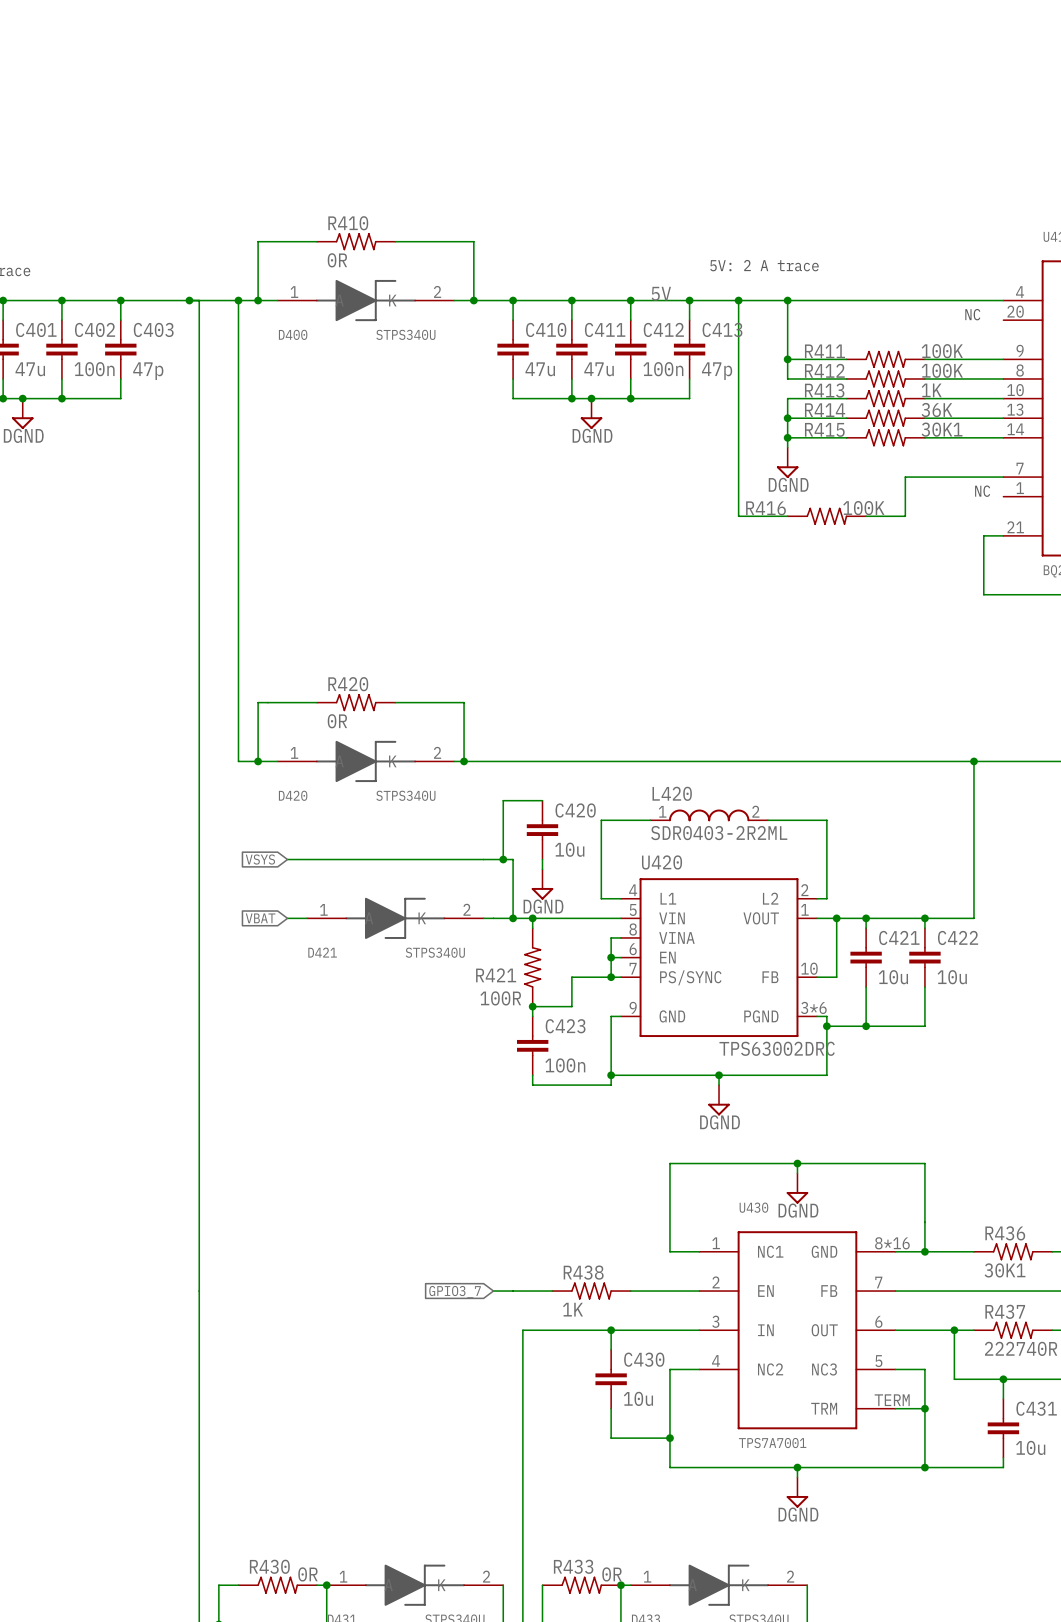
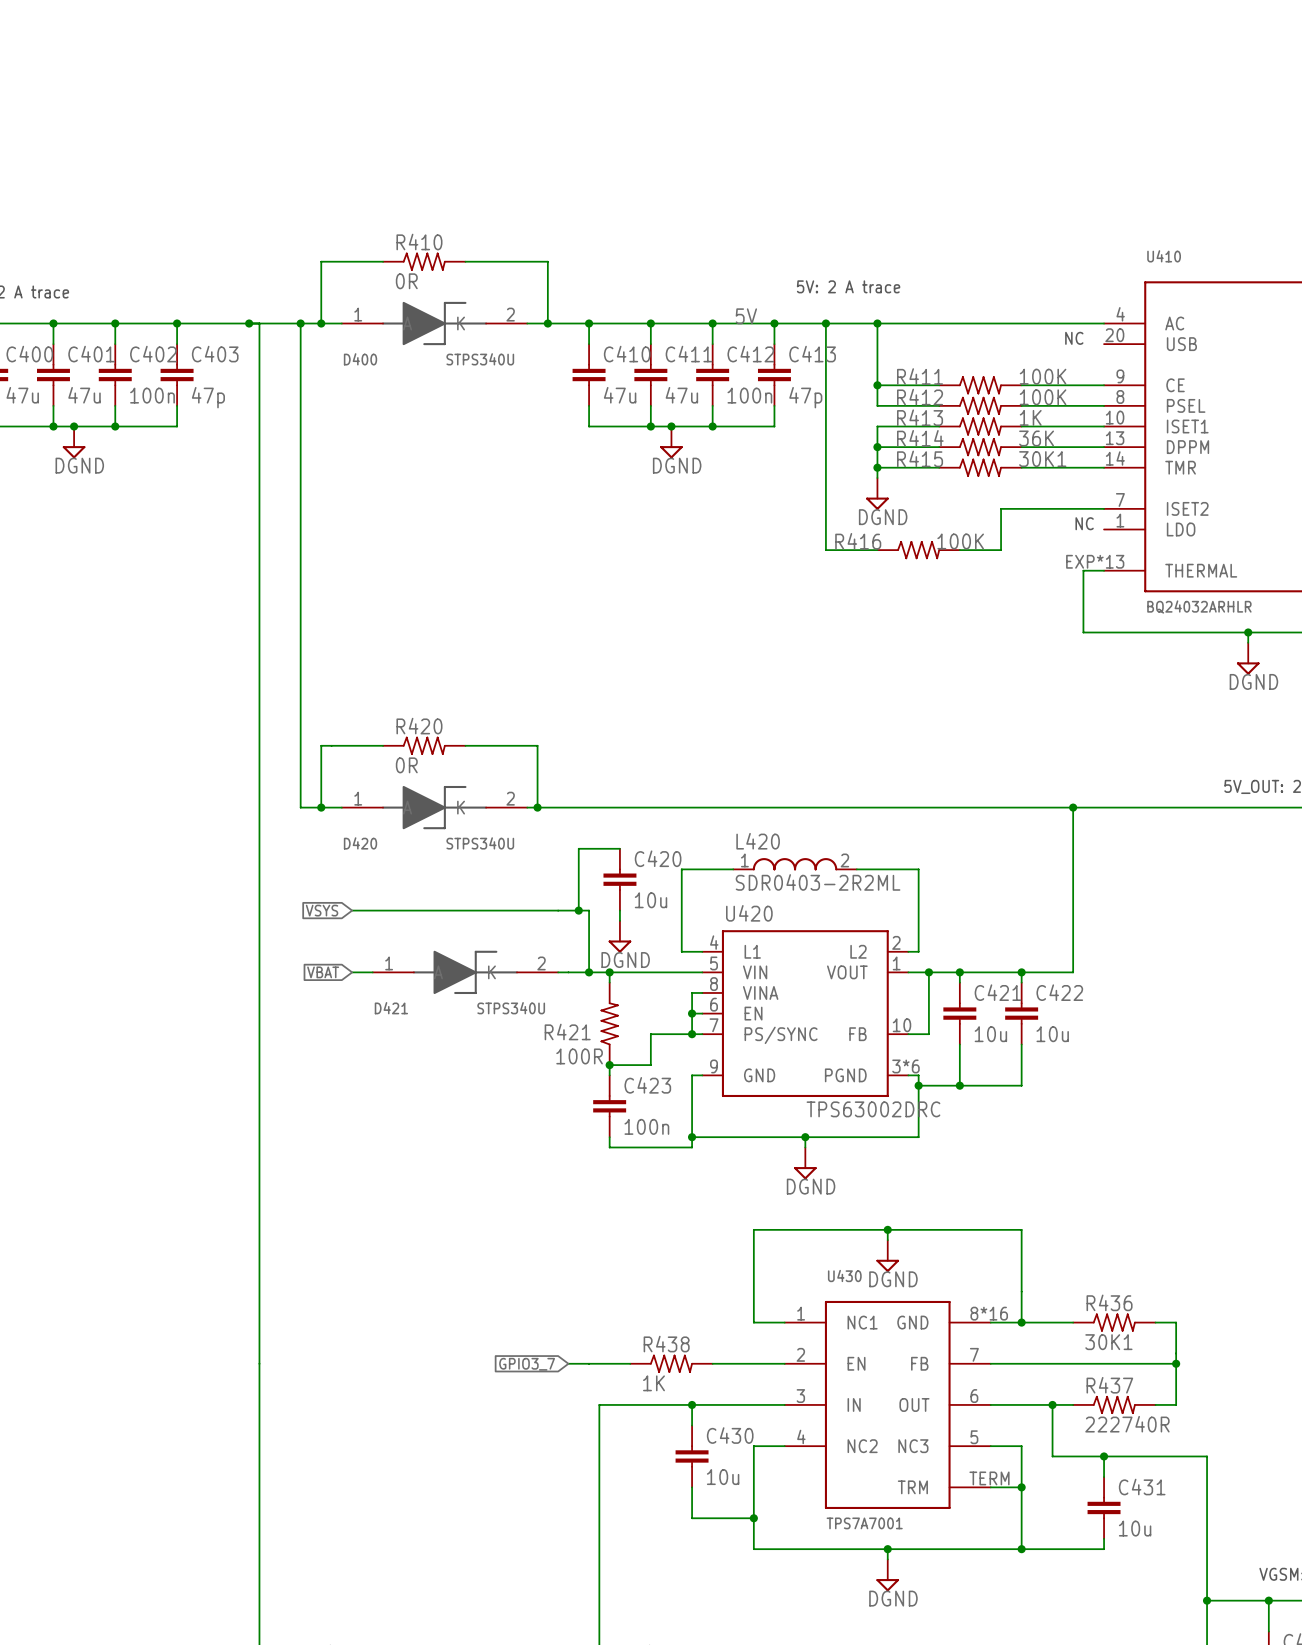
U410 pin number: 21 (1015, 527) -> EXP*13 (1095, 561)

